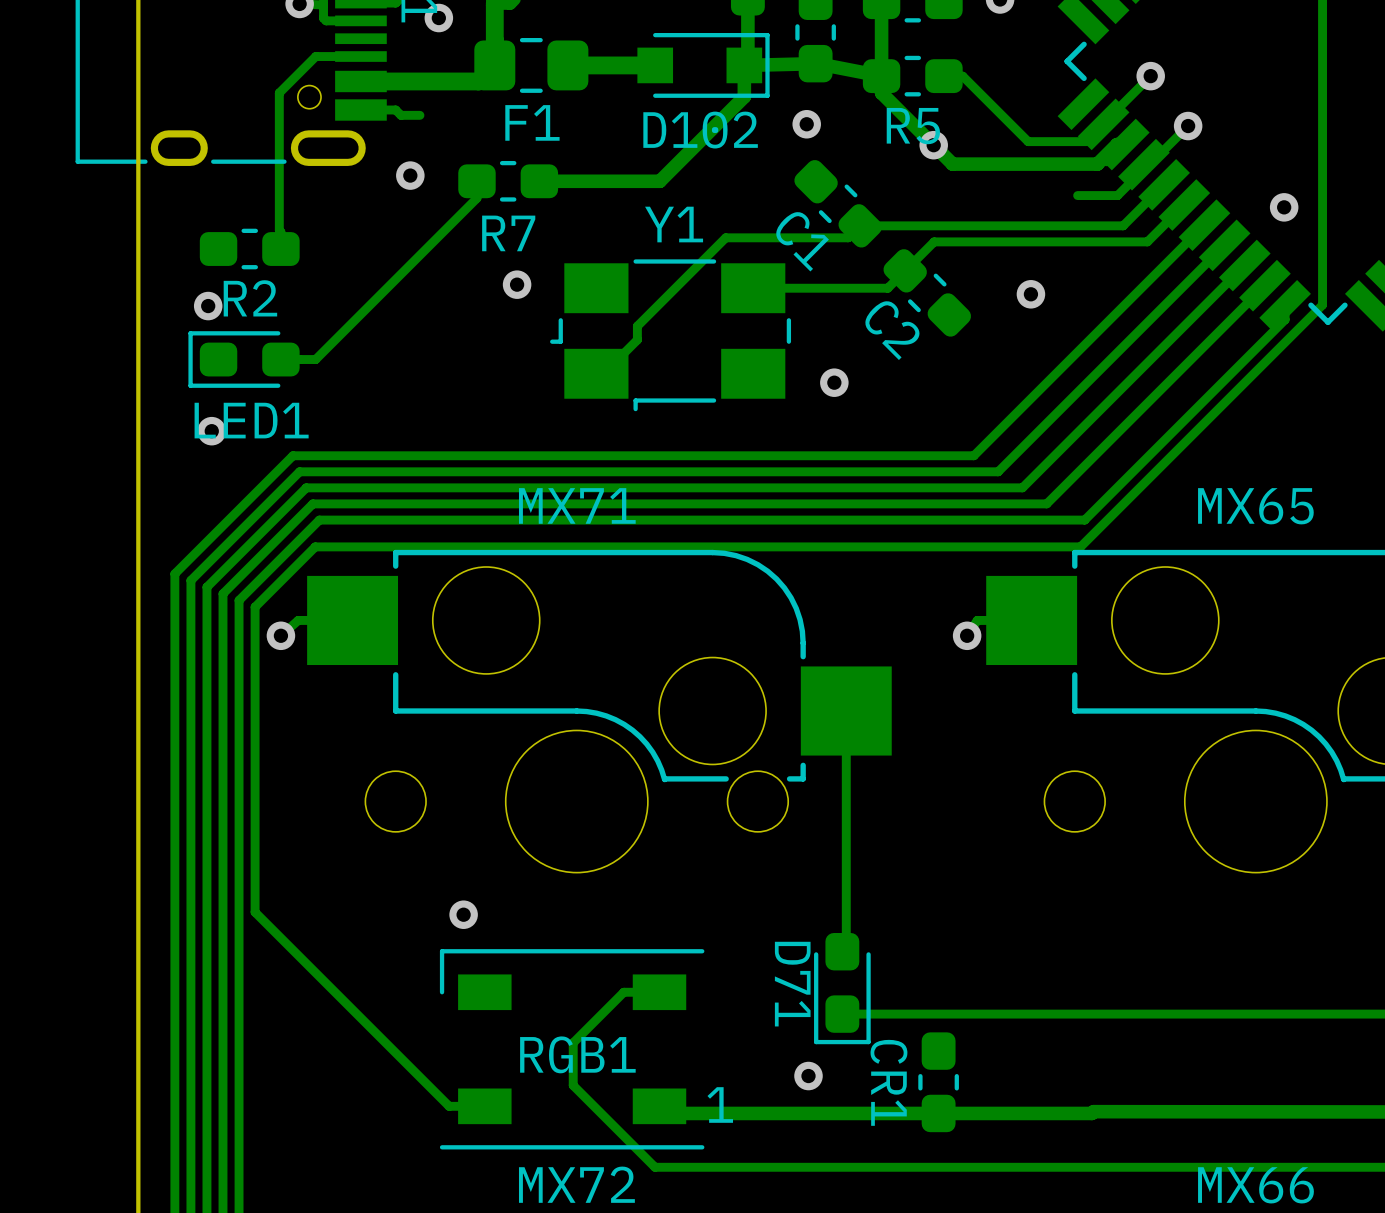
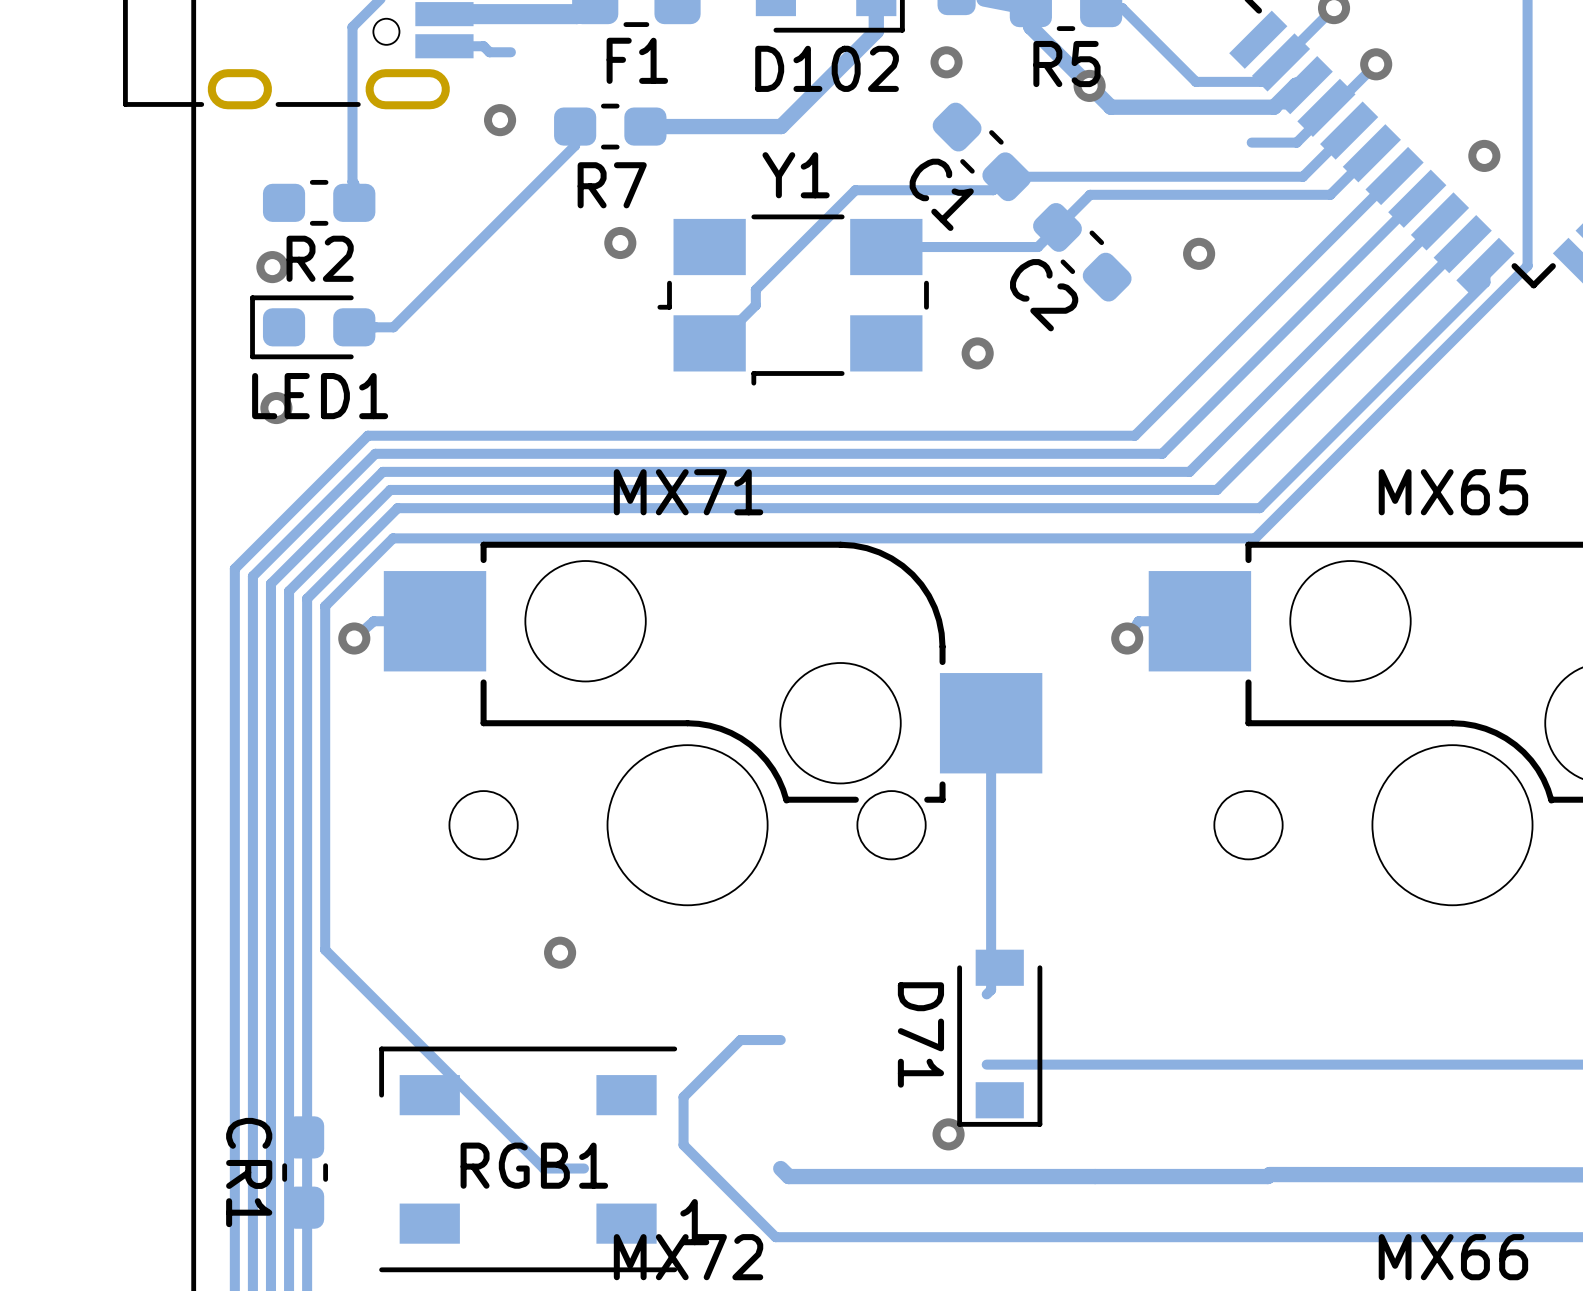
D71 footprint: [814, 932, 871, 1045] -> [957, 949, 1043, 1127]
RGB1 position: (572, 1049) -> (528, 1159)
CR1 position: (938, 1082) -> (305, 1172)

